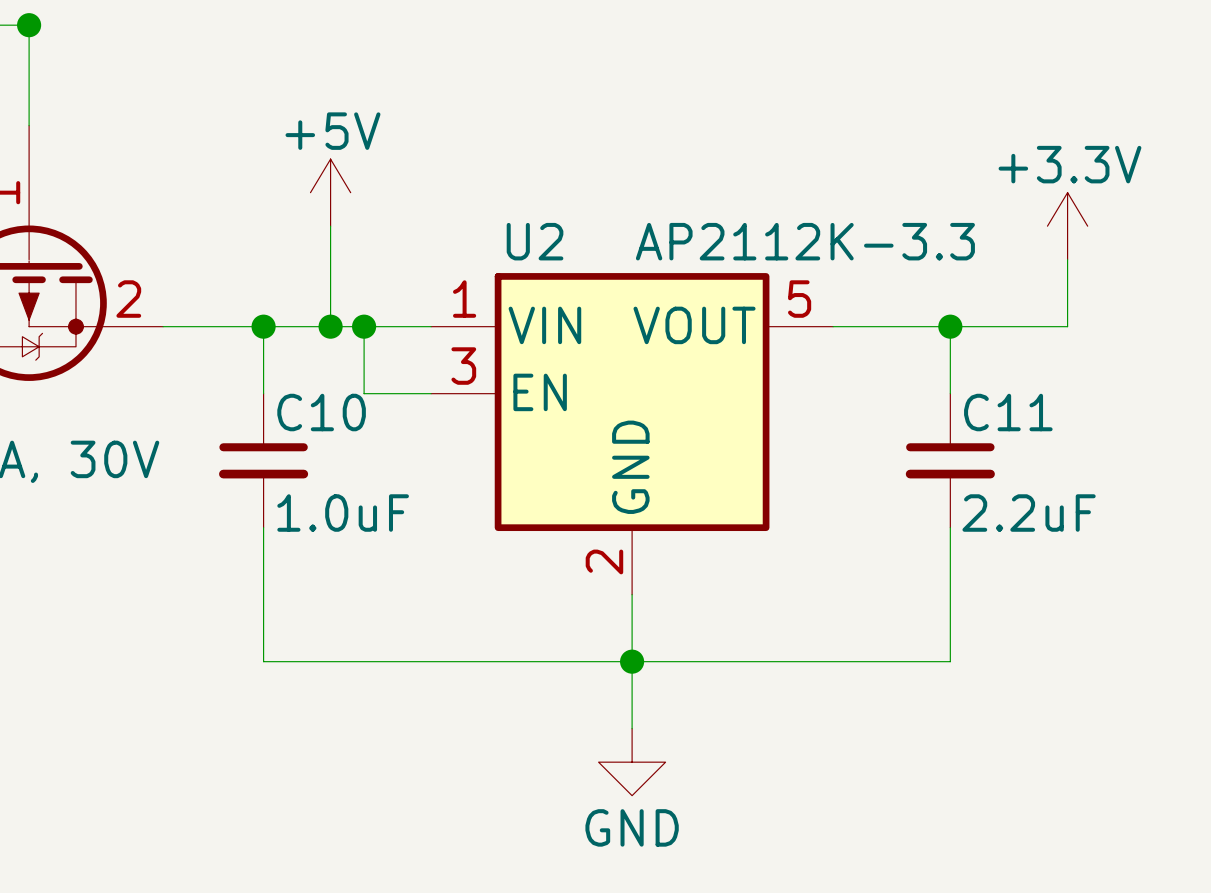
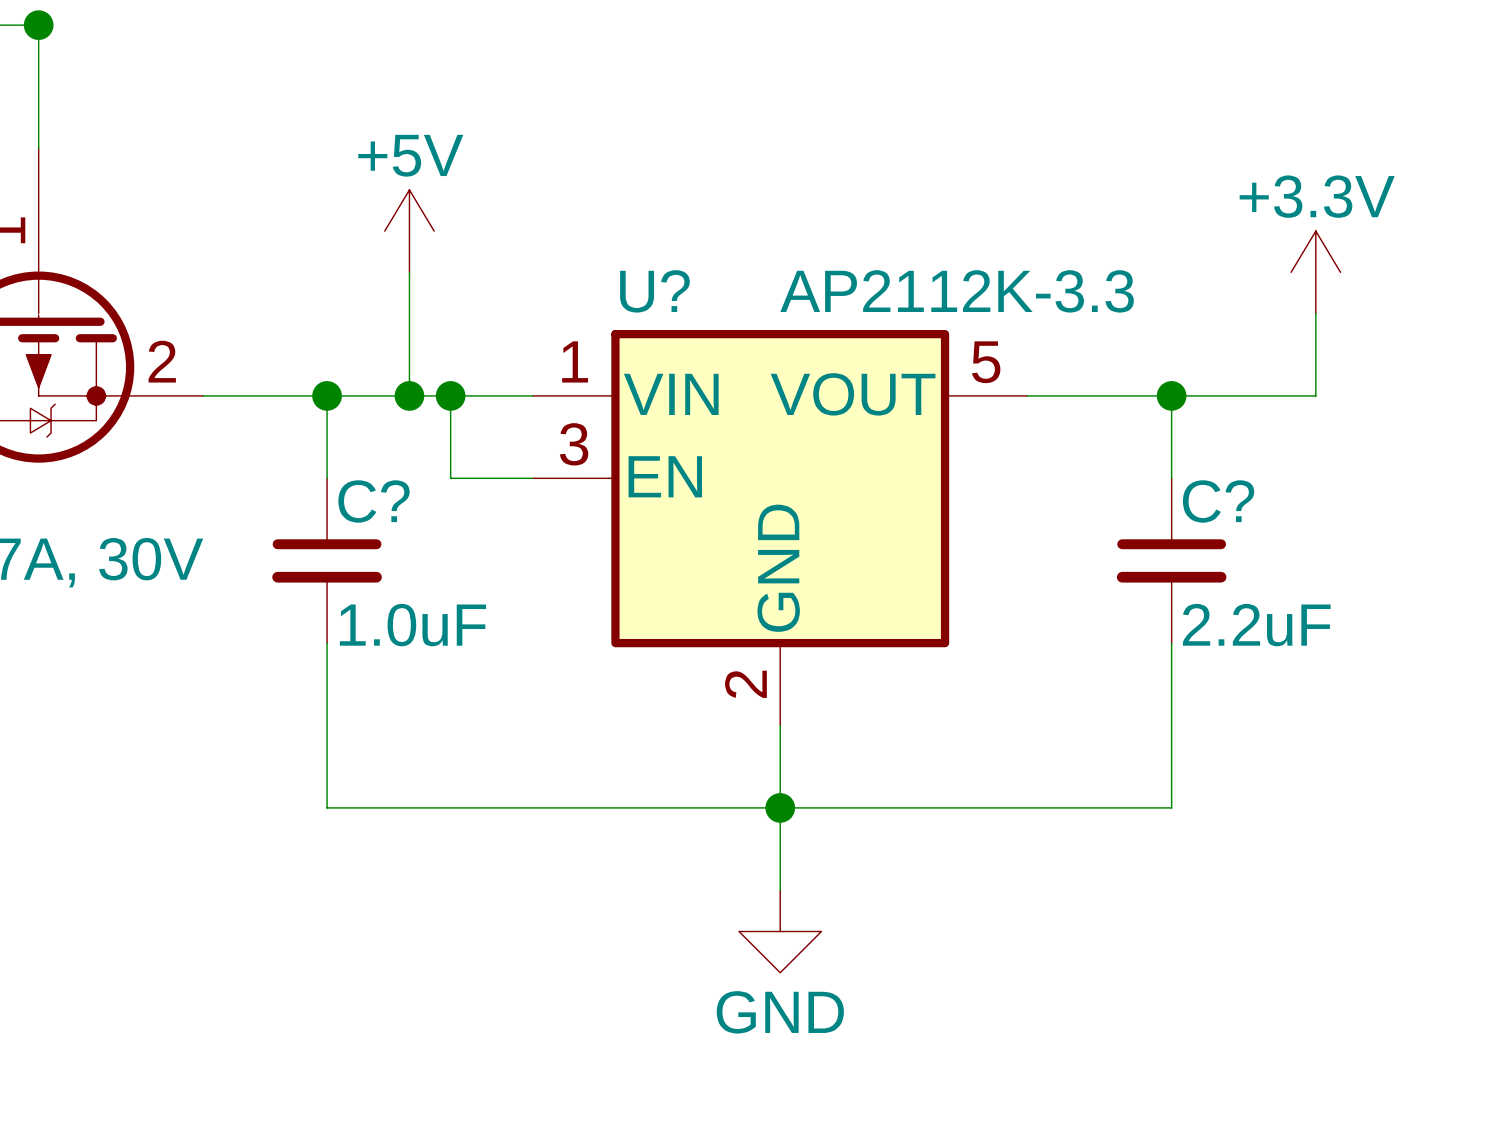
U2 name: U2 (535, 241) -> U? (654, 291)
C10 name: C10 (321, 412) -> C? (373, 501)
C11 name: C11 (1008, 412) -> C? (1218, 501)

